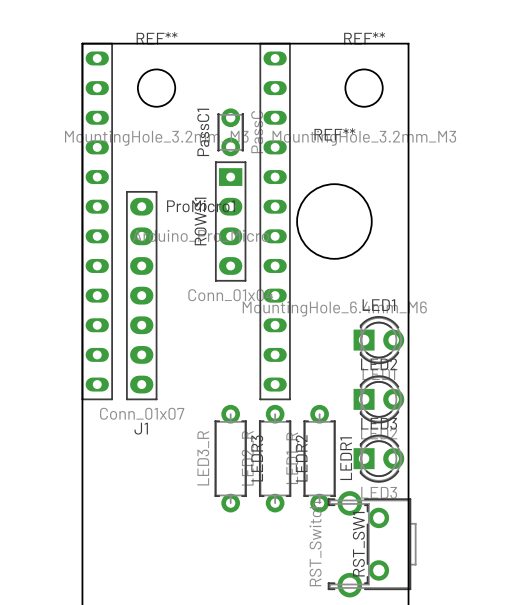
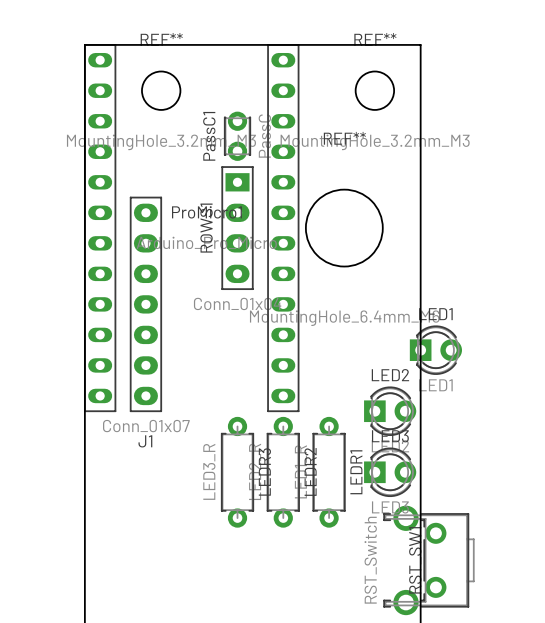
LED1 position: (378, 340) -> (435, 350)
RST_SW1 position: (372, 544) -> (428, 560)

